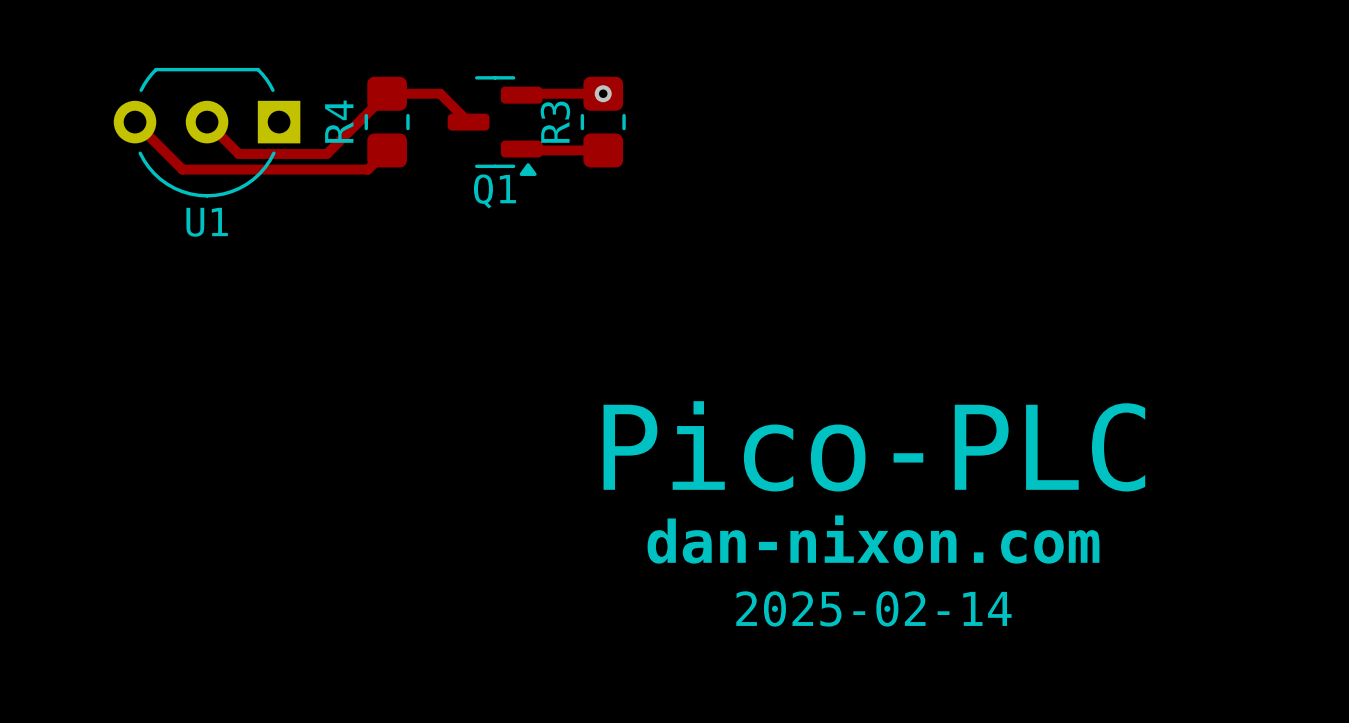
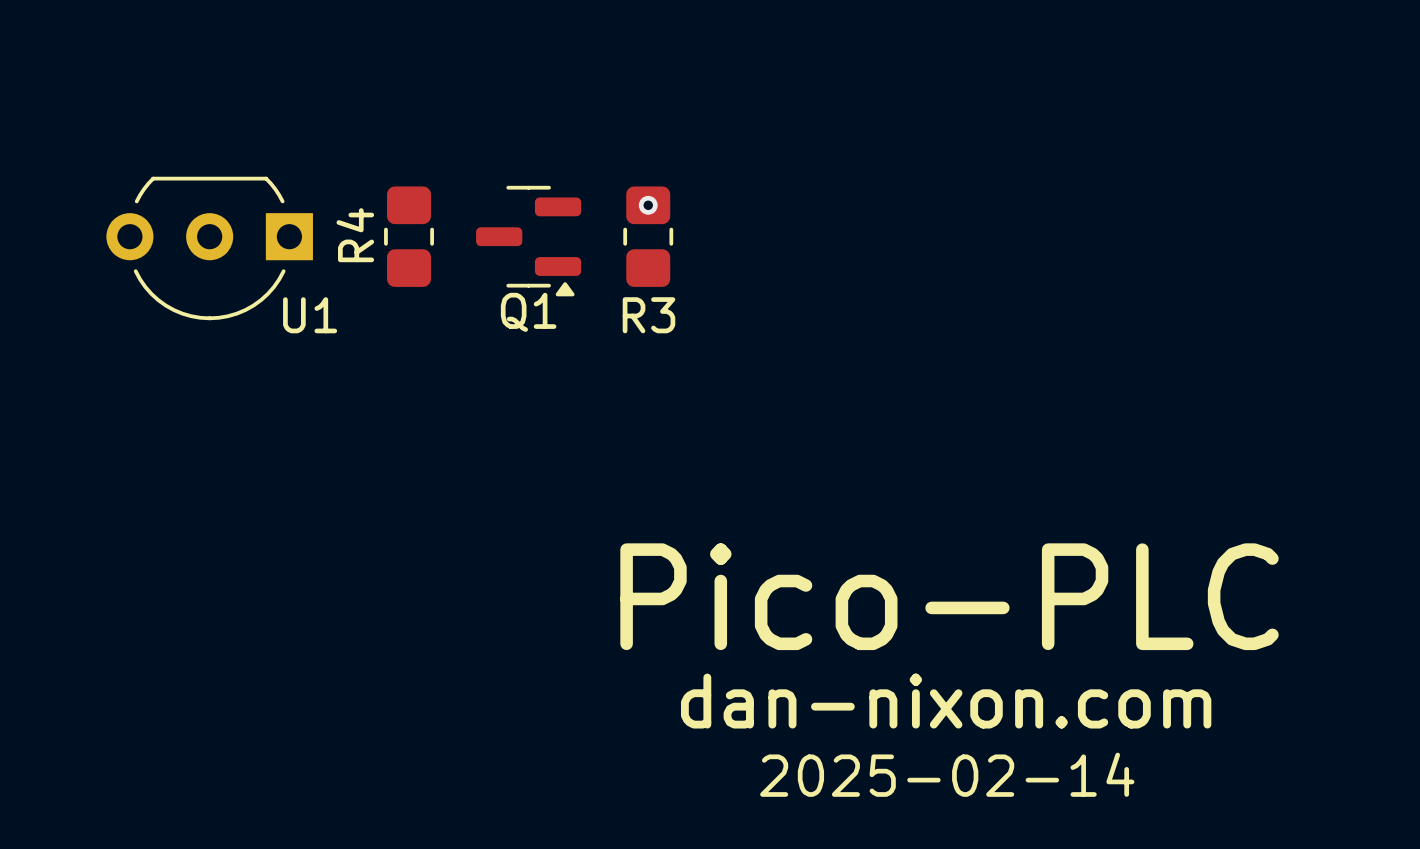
track: (603, 93) (521, 95) -> none
track: (135, 122) (182, 169) (367, 169) (387, 150) -> none
track: (207, 122) (238, 154) (326, 154) (387, 93) (440, 93) (468, 122) -> none
R3 name rotation: 0° (555, 122) -> 90° clockwise (648, 315)
R3 name position: R3 (555, 122) -> R3 (648, 315)
track: (521, 149) (610, 150) -> none
U1 name position: U1 (207, 222) -> U1 (310, 315)

